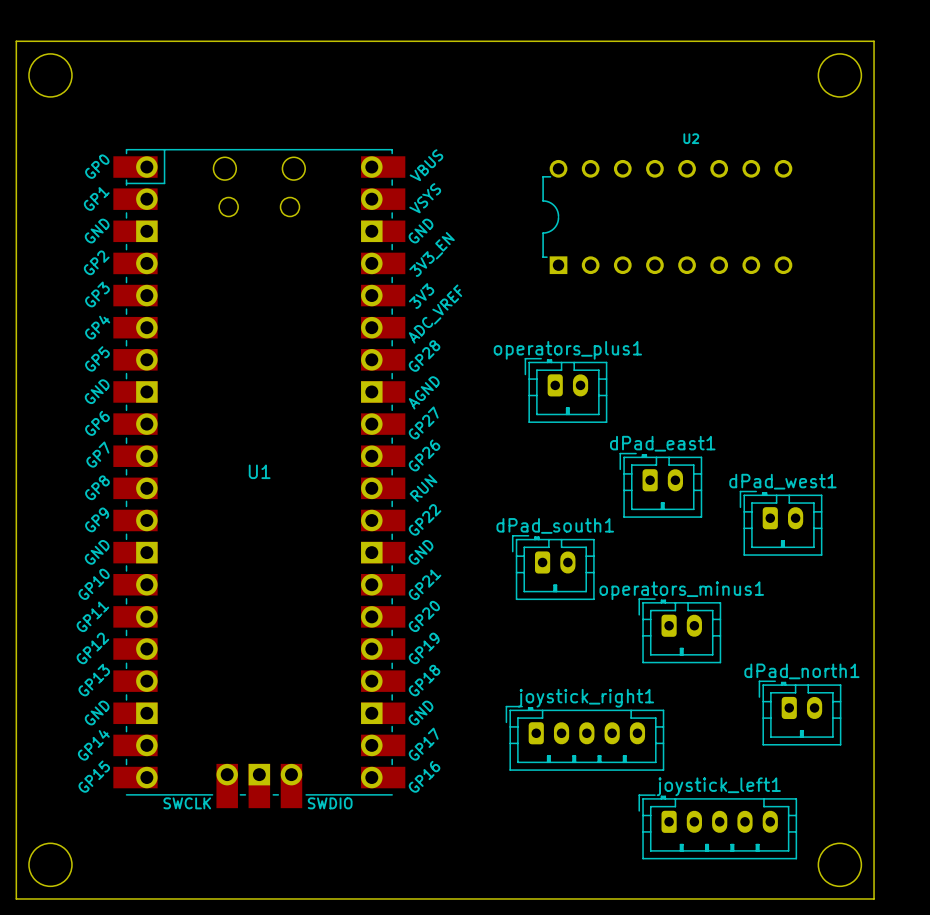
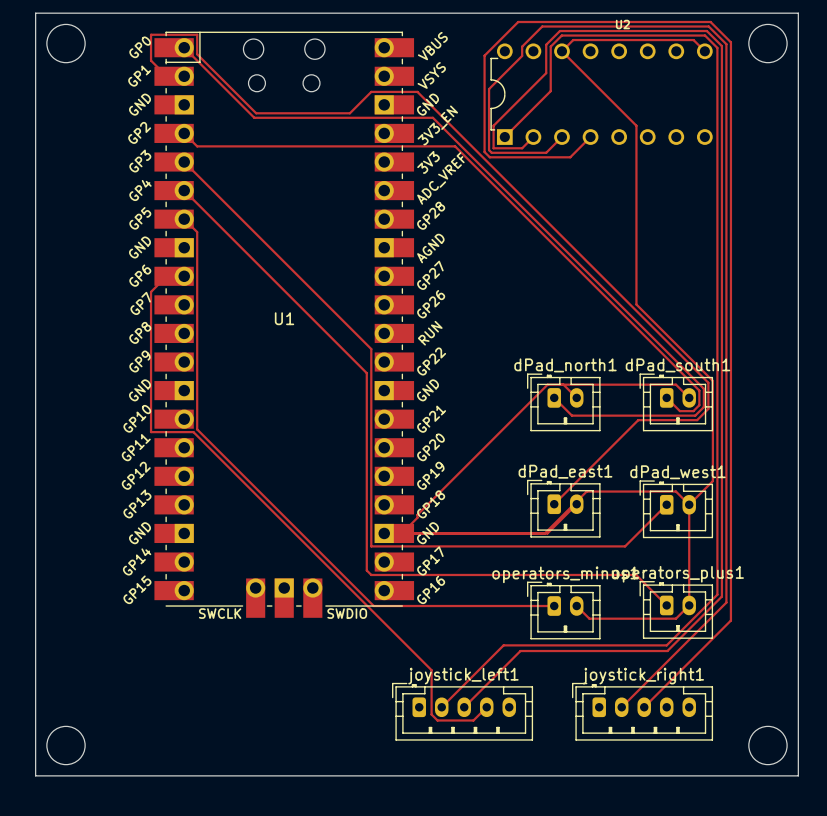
track: none -> (166, 47) (184, 47) (254, 117) (432, 117) (703, 388) (703, 407) (695, 415) (571, 415) (554, 397)
track: none -> (704, 51) (693, 40) (573, 40) (561, 51) (636, 125) (636, 304) (712, 380) (712, 481) (689, 504)
track: none -> (184, 76) (166, 76) (151, 60) (151, 34) (197, 34) (197, 54) (256, 113) (349, 113) (371, 91) (417, 91) (708, 382) (708, 408) (697, 420) (638, 420) (554, 504)
track: none -> (184, 133) (197, 146) (455, 146) (699, 390) (699, 405) (693, 411) (679, 411) (666, 397)
track: none -> (504, 137) (550, 91) (550, 46) (561, 35) (705, 35) (717, 47) (717, 594) (666, 645) (503, 645) (441, 707)
track: none -> (533, 137) (522, 148) (493, 148) (493, 125) (546, 73) (546, 44) (559, 31) (706, 31) (721, 46) (721, 596) (667, 651) (520, 651) (464, 707)
track: none -> (561, 137) (546, 152) (491, 152) (489, 150) (489, 89) (522, 55) (522, 46) (542, 26) (708, 26) (726, 44) (726, 602) (621, 707)
track: none -> (590, 137) (570, 157) (489, 157) (484, 152) (484, 55) (518, 22) (710, 22) (730, 42) (730, 620) (644, 707)
track: none -> (184, 162) (371, 349) (371, 546) (625, 546) (666, 504)
U2 position: (667, 217) -> (601, 94)
track: none -> (184, 190) (366, 373) (366, 570) (371, 574) (636, 574) (666, 605)
track: none -> (184, 219) (197, 232) (197, 429) (373, 606) (554, 606)
track: none -> (184, 276) (166, 276) (151, 291) (151, 432) (193, 432) (431, 670) (431, 714) (437, 720) (473, 720) (486, 707)
operators_plus1 position: (565, 390) -> (676, 609)
track: none -> (563, 384) (576, 397)
track: none -> (689, 397) (675, 384) (547, 384) (417, 514) (417, 517) (401, 533)
U1 position: (259, 478) -> (284, 324)
dPad_east1 position: (660, 485) -> (563, 508)
dPad_west1 position: (781, 523) -> (676, 509)
dPad_south1 position: (553, 567) -> (676, 402)
track: none -> (576, 504) (547, 533) (384, 533)
track: none -> (689, 504) (689, 605) (675, 618) (589, 618) (576, 606)
track: none -> (689, 504) (675, 491) (586, 491) (544, 533)
operators_minus1 position: (679, 630) -> (563, 610)
dPad_north1 position: (800, 713) -> (563, 402)
joystick_right1 position: (584, 738) -> (642, 711)
joystick_left1 position: (717, 826) -> (462, 711)

